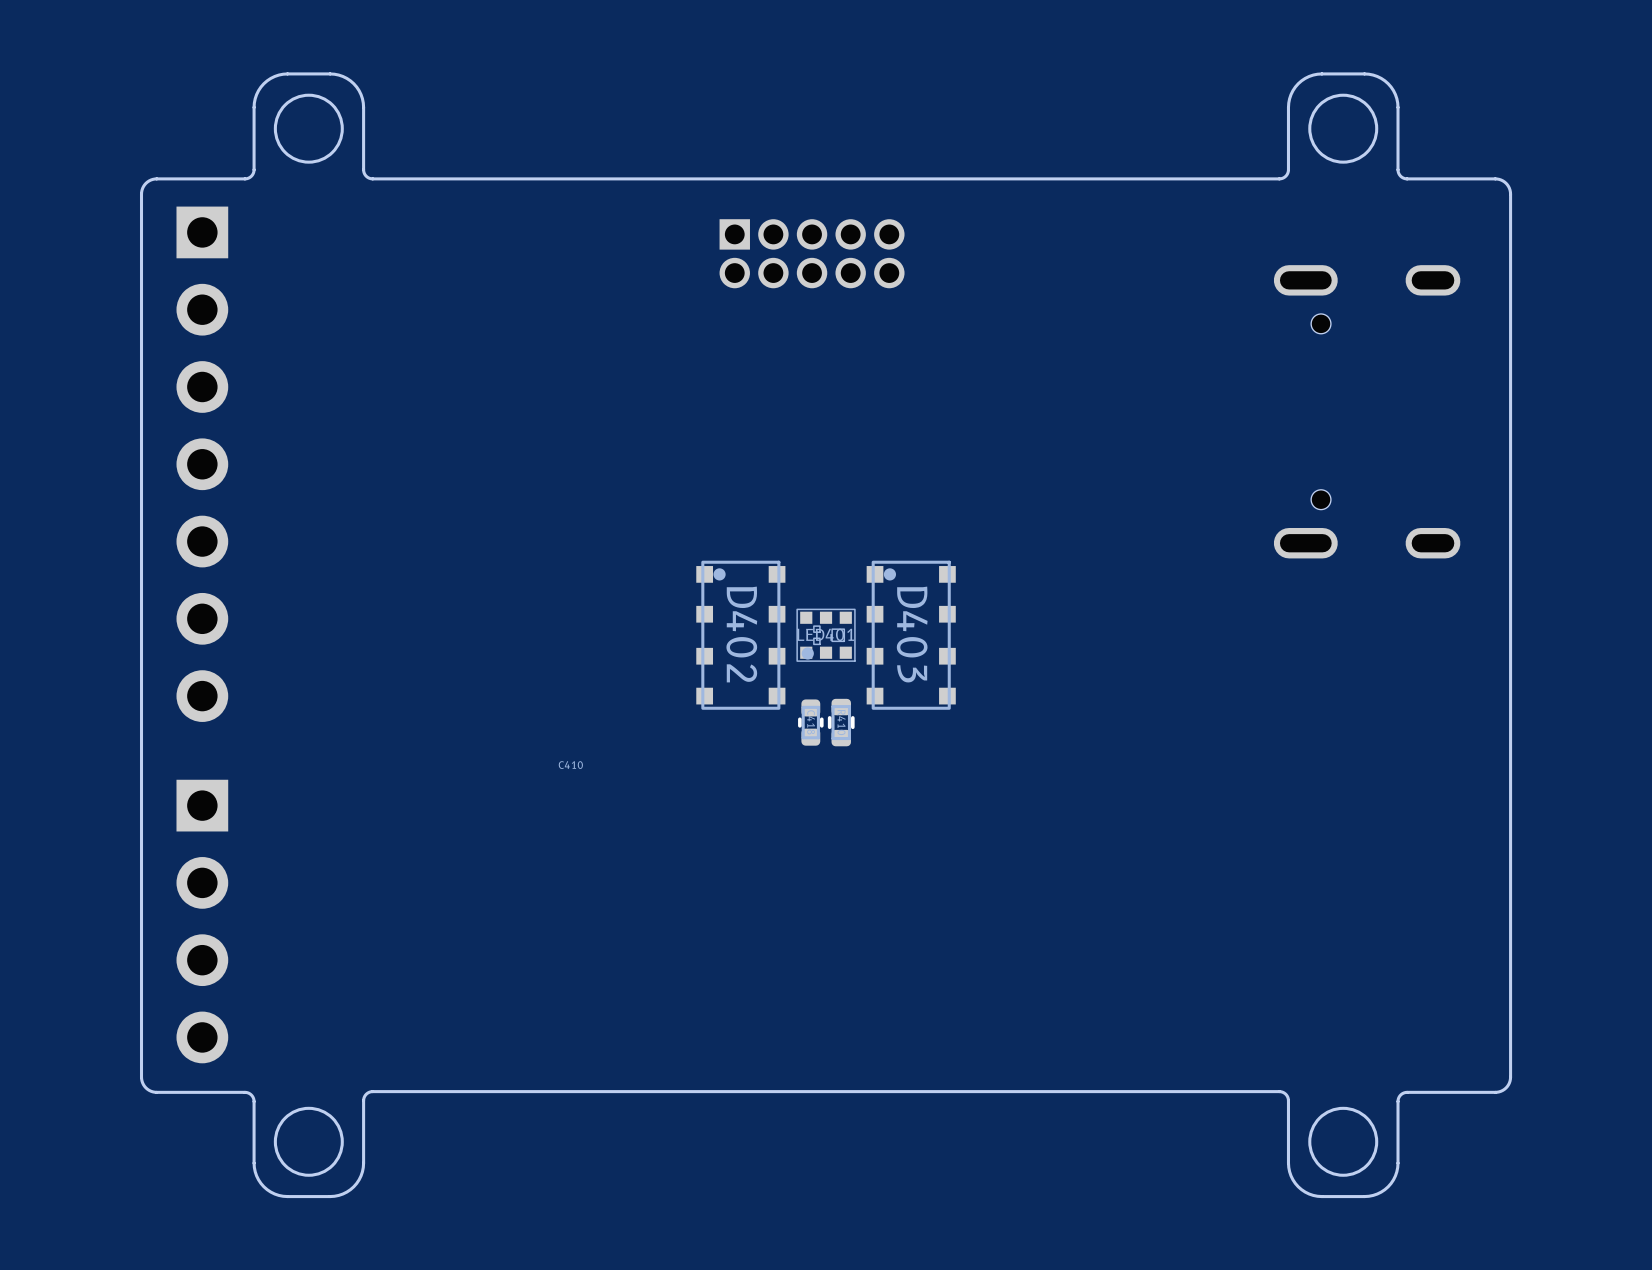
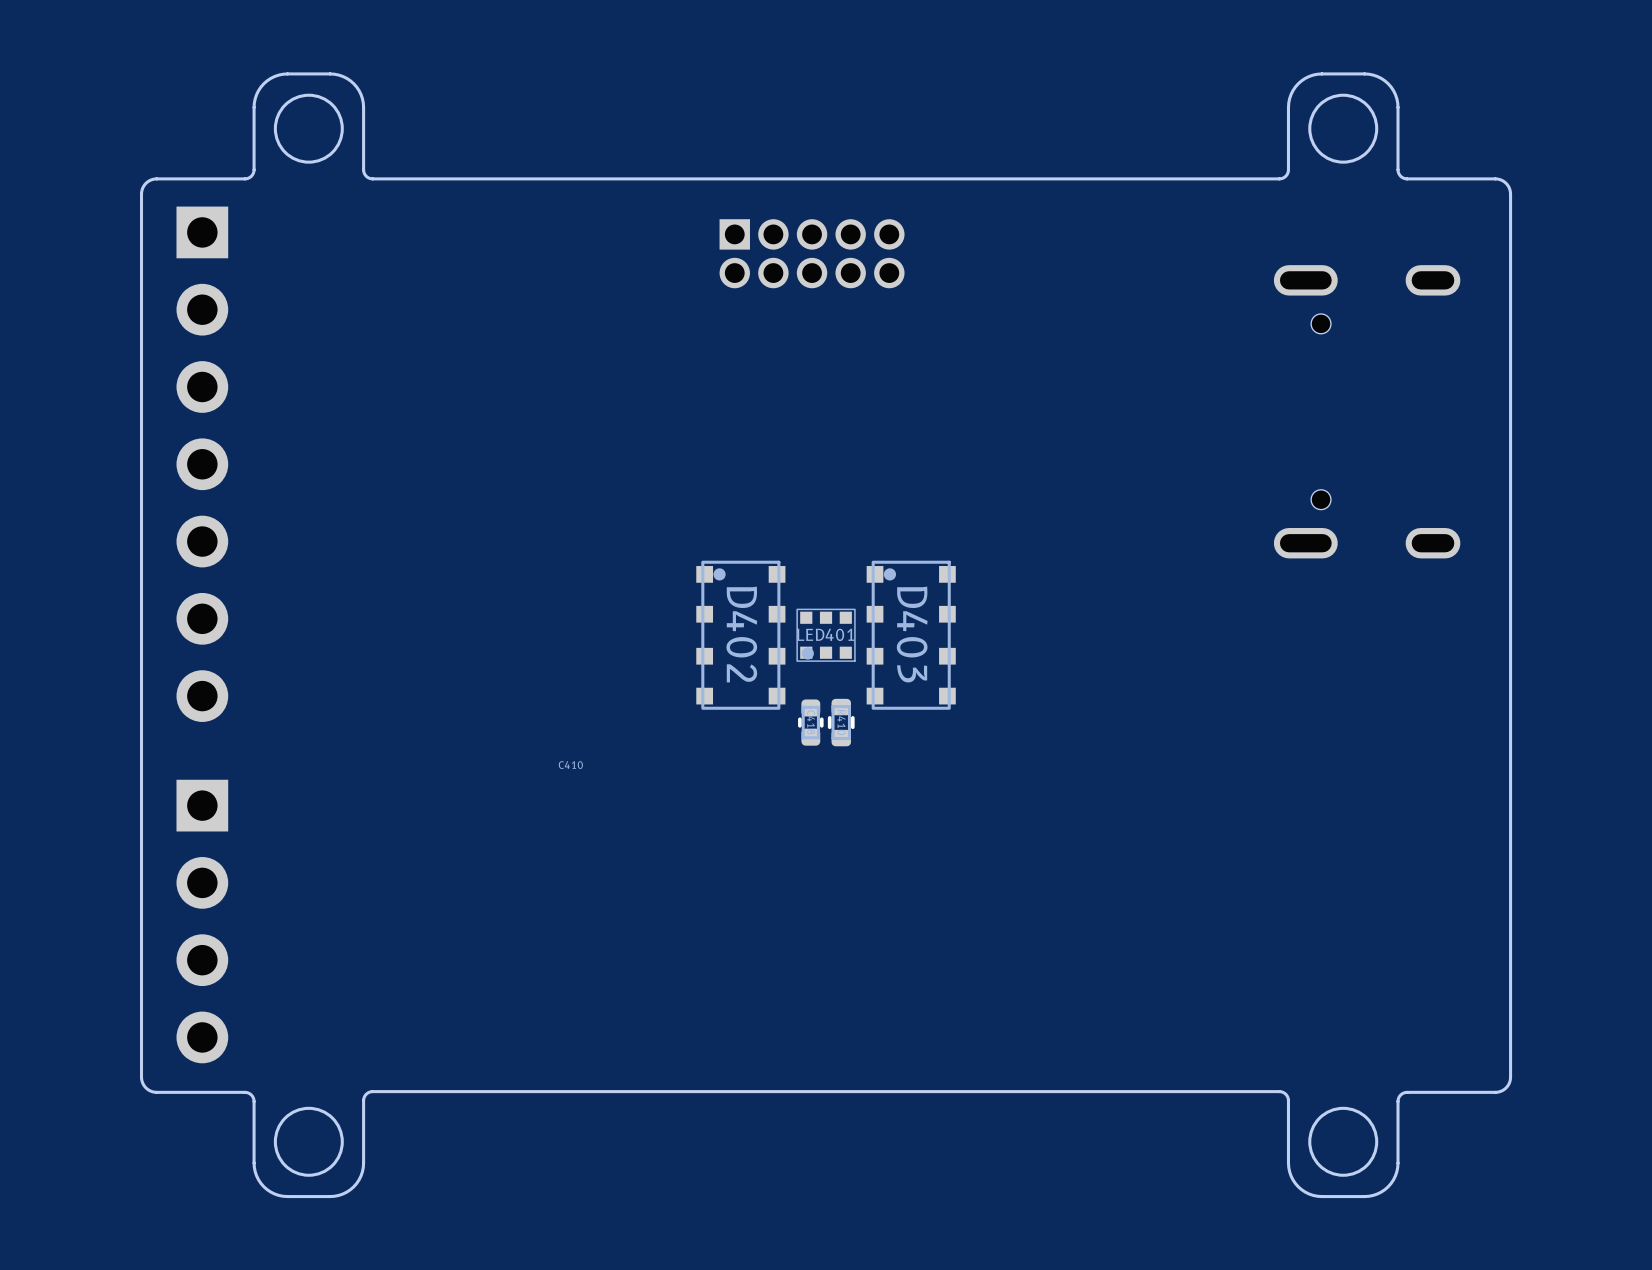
LED401 footprint: [796, 608, 856, 662] -> [796, 608, 856, 662]

